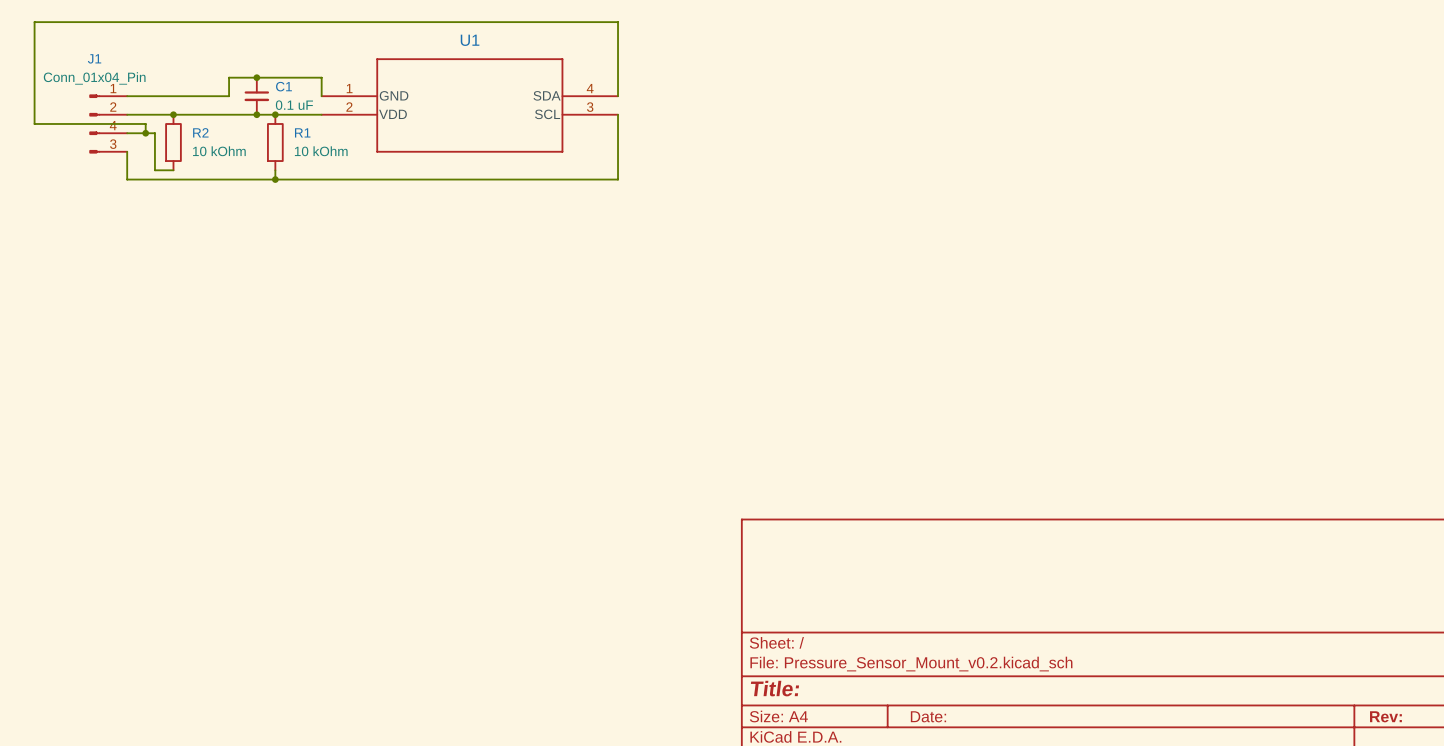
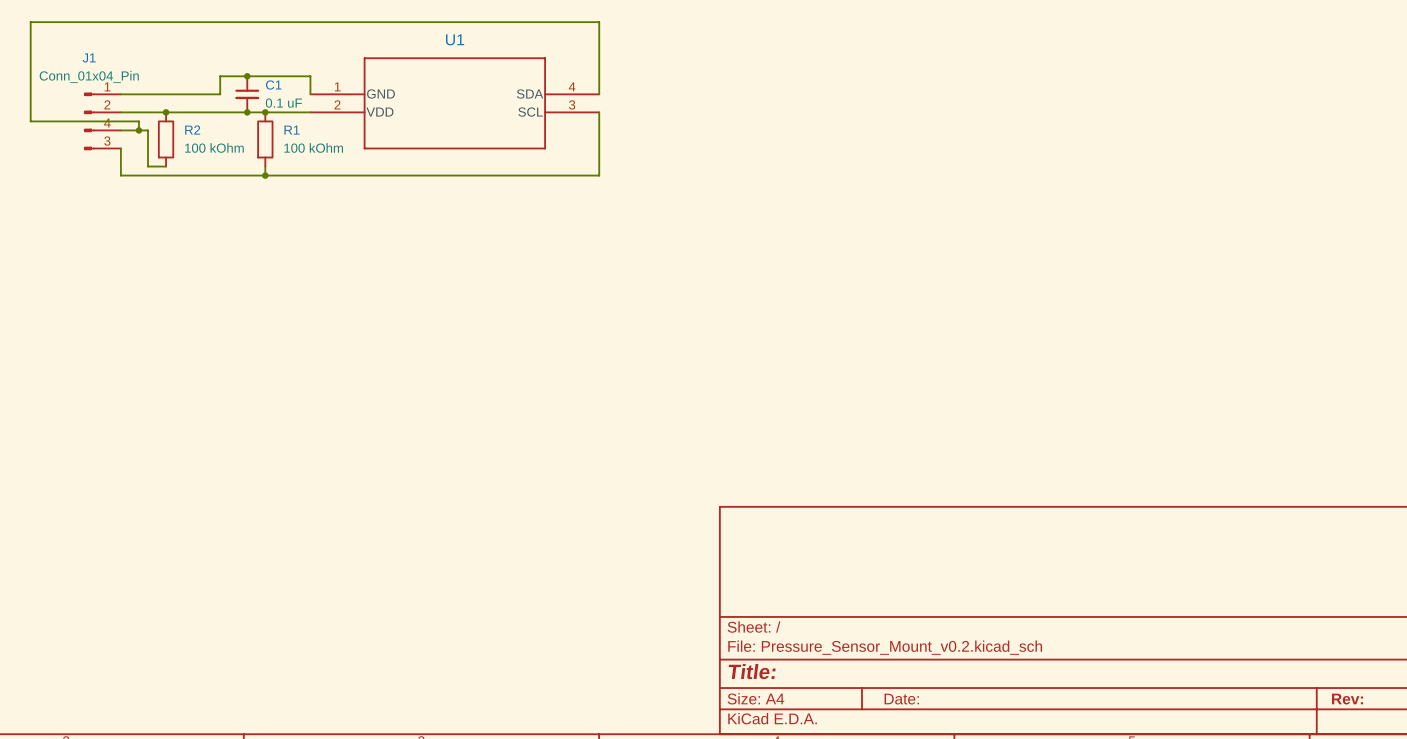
R2 value: 10 kOhm (219, 151) -> 100 kOhm (214, 147)
R1 value: 10 kOhm (321, 151) -> 100 kOhm (313, 147)

